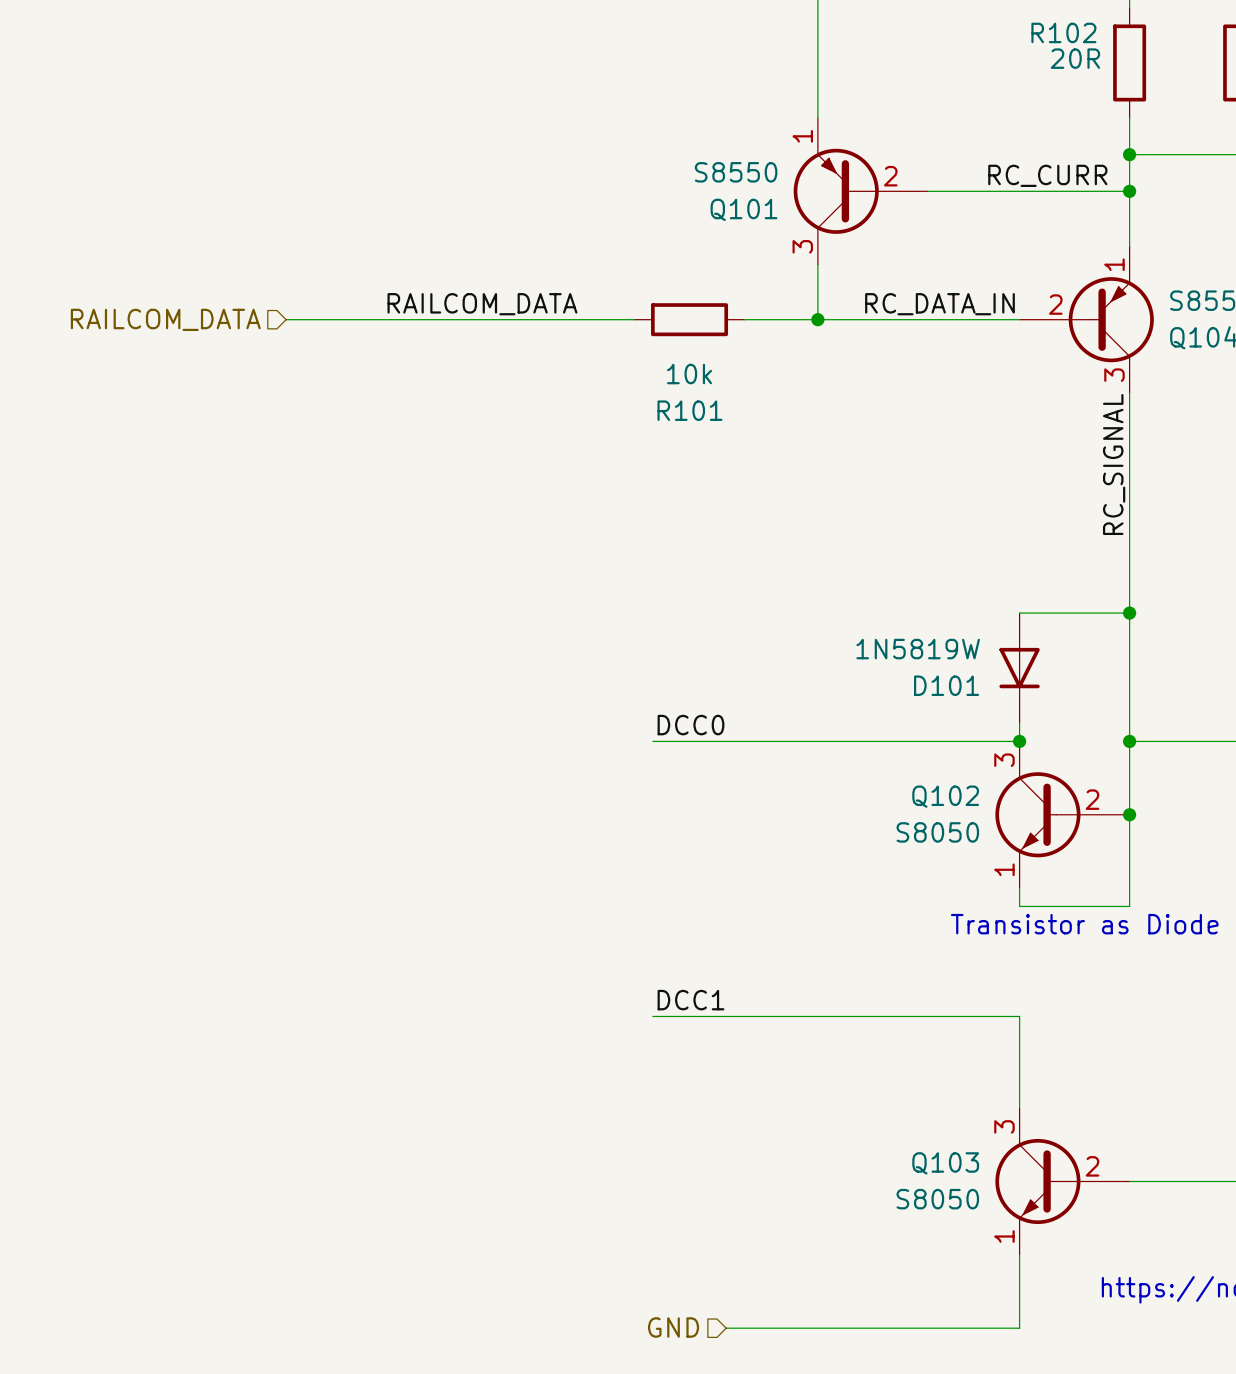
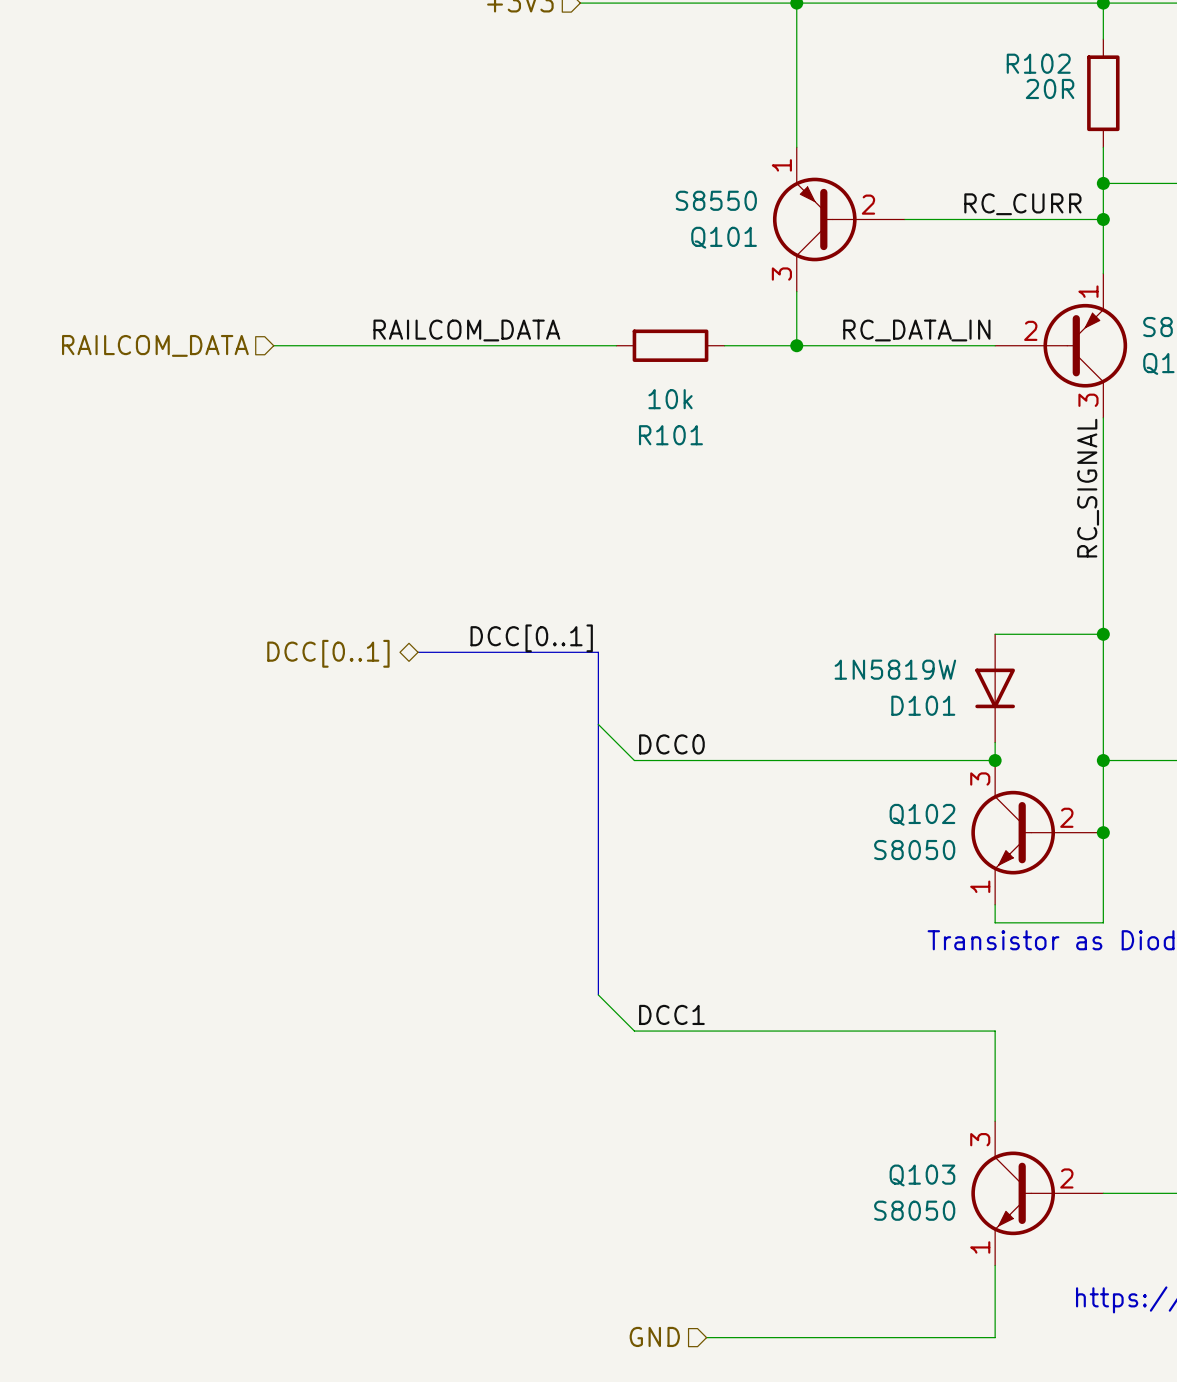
label: none -> DCC[0..1] (531, 638)
bus: none -> (418, 652) (598, 652) (598, 994)
hierarchical label: none -> DCC[0..1] (328, 653)
wire: none -> (598, 724) (634, 760)
wire: none -> (598, 994) (634, 1031)

